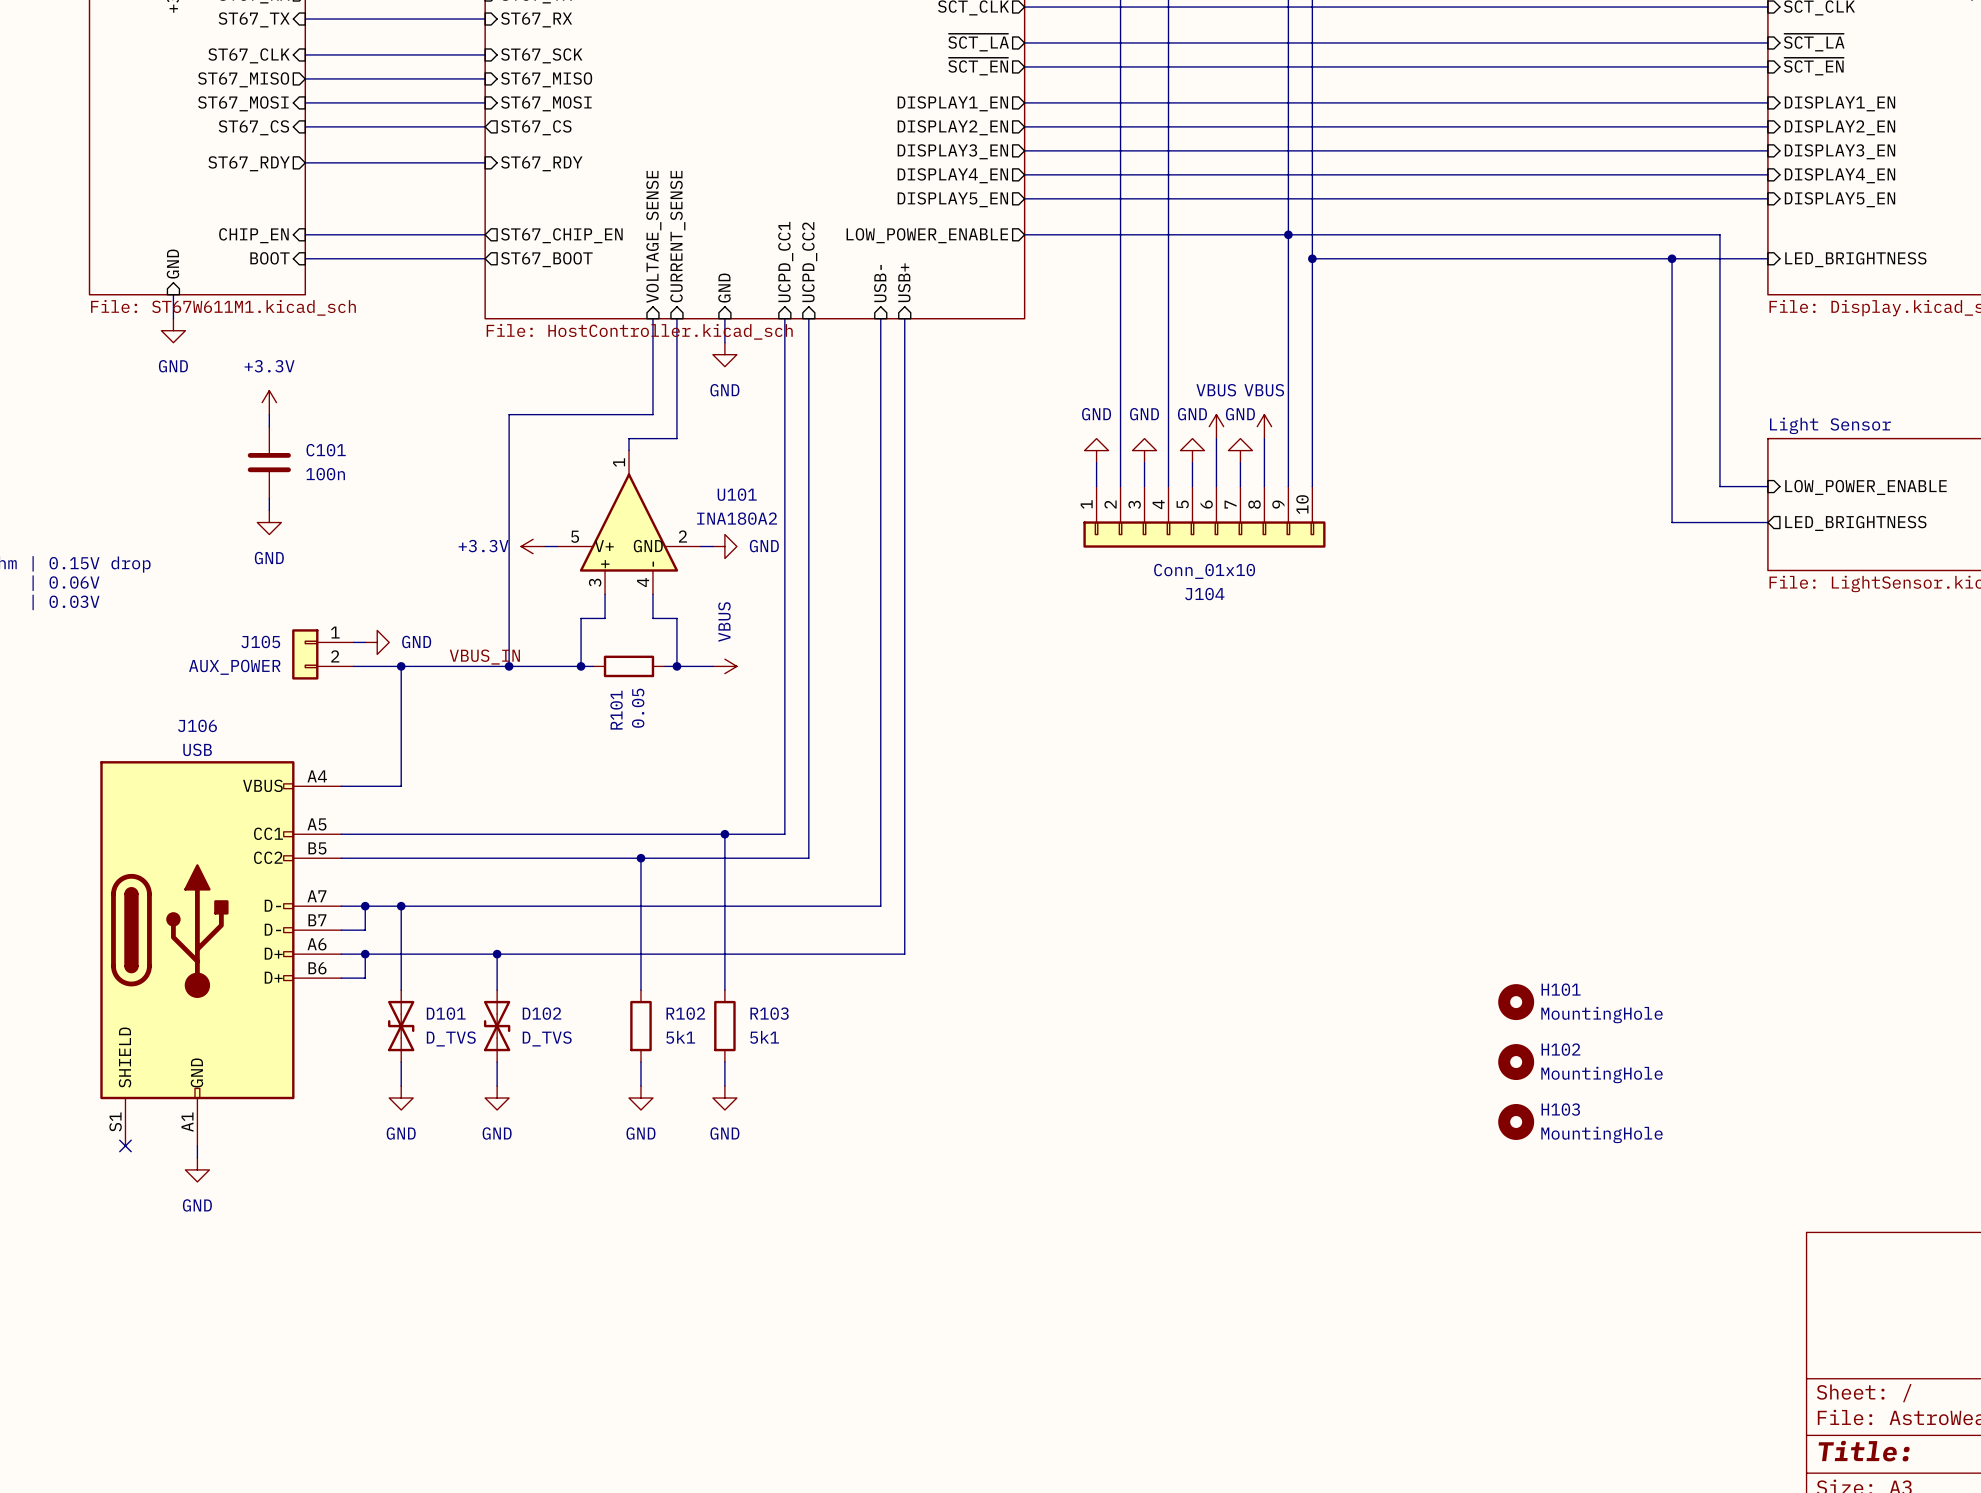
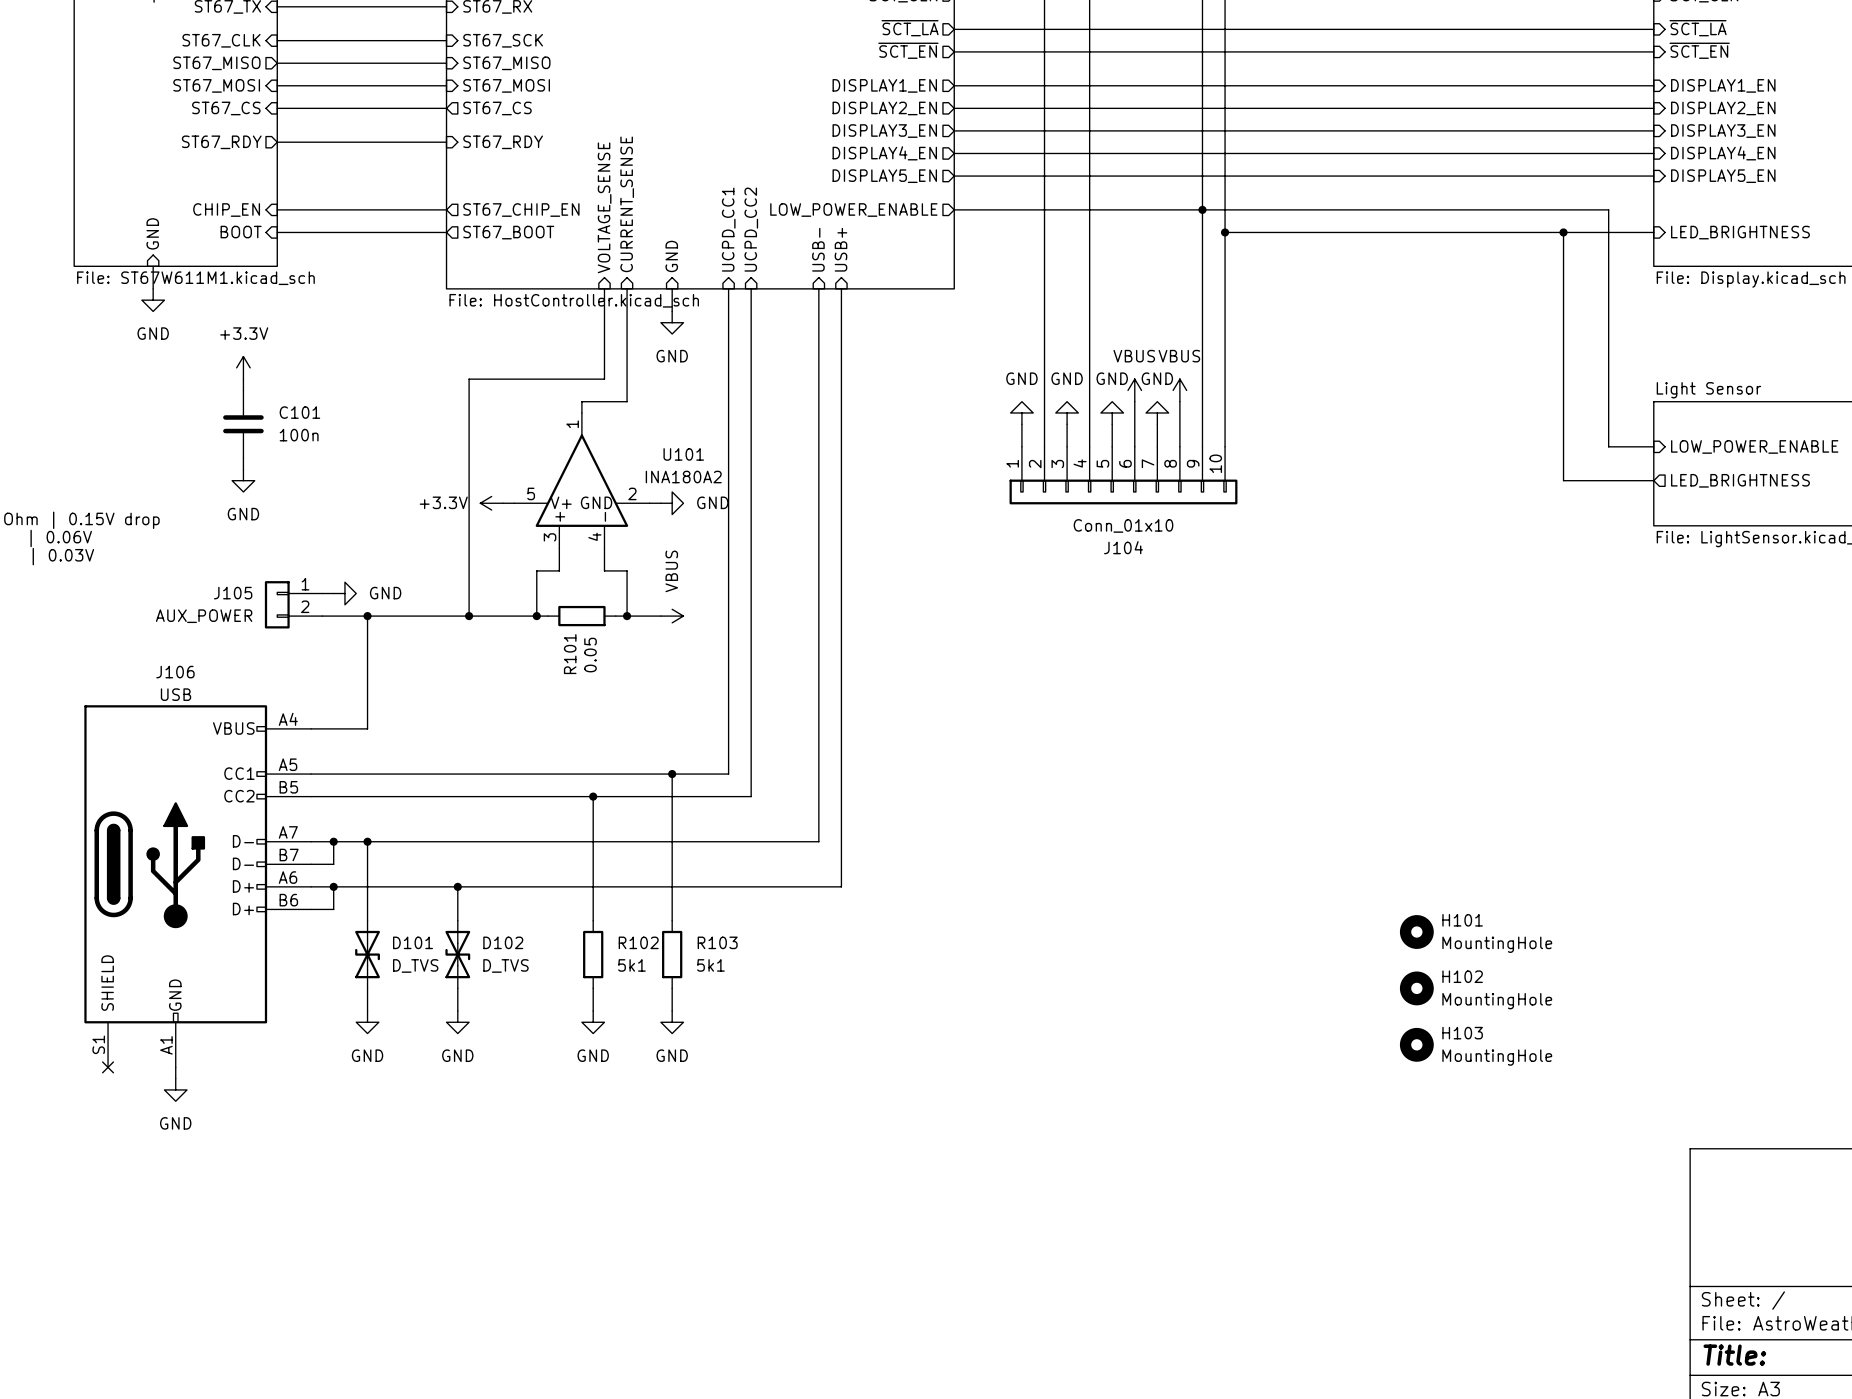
label: VBUS_IN (484, 657) -> none

